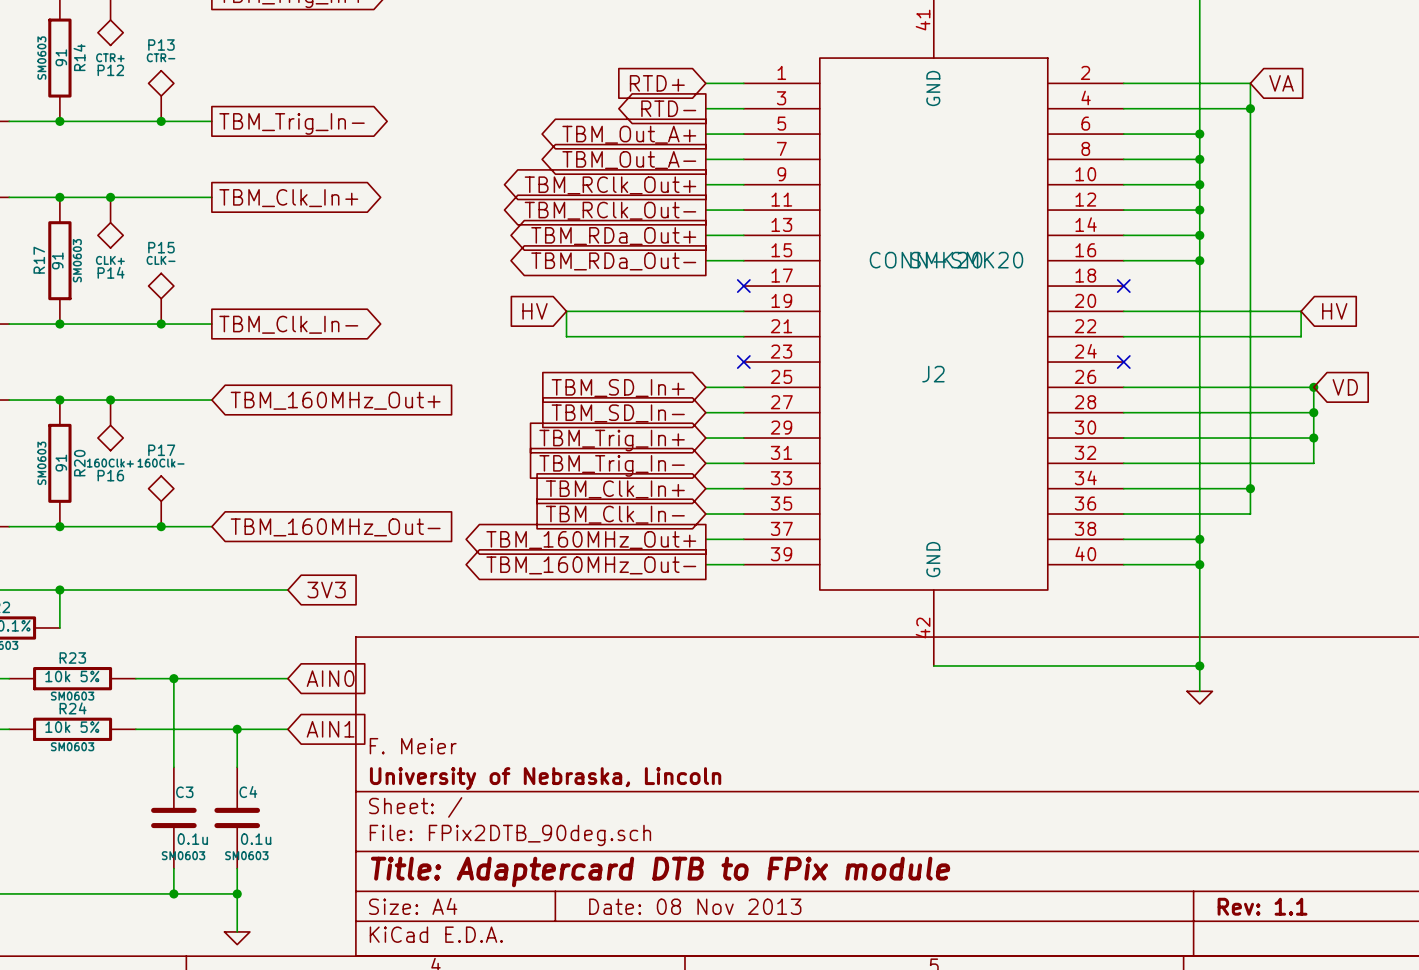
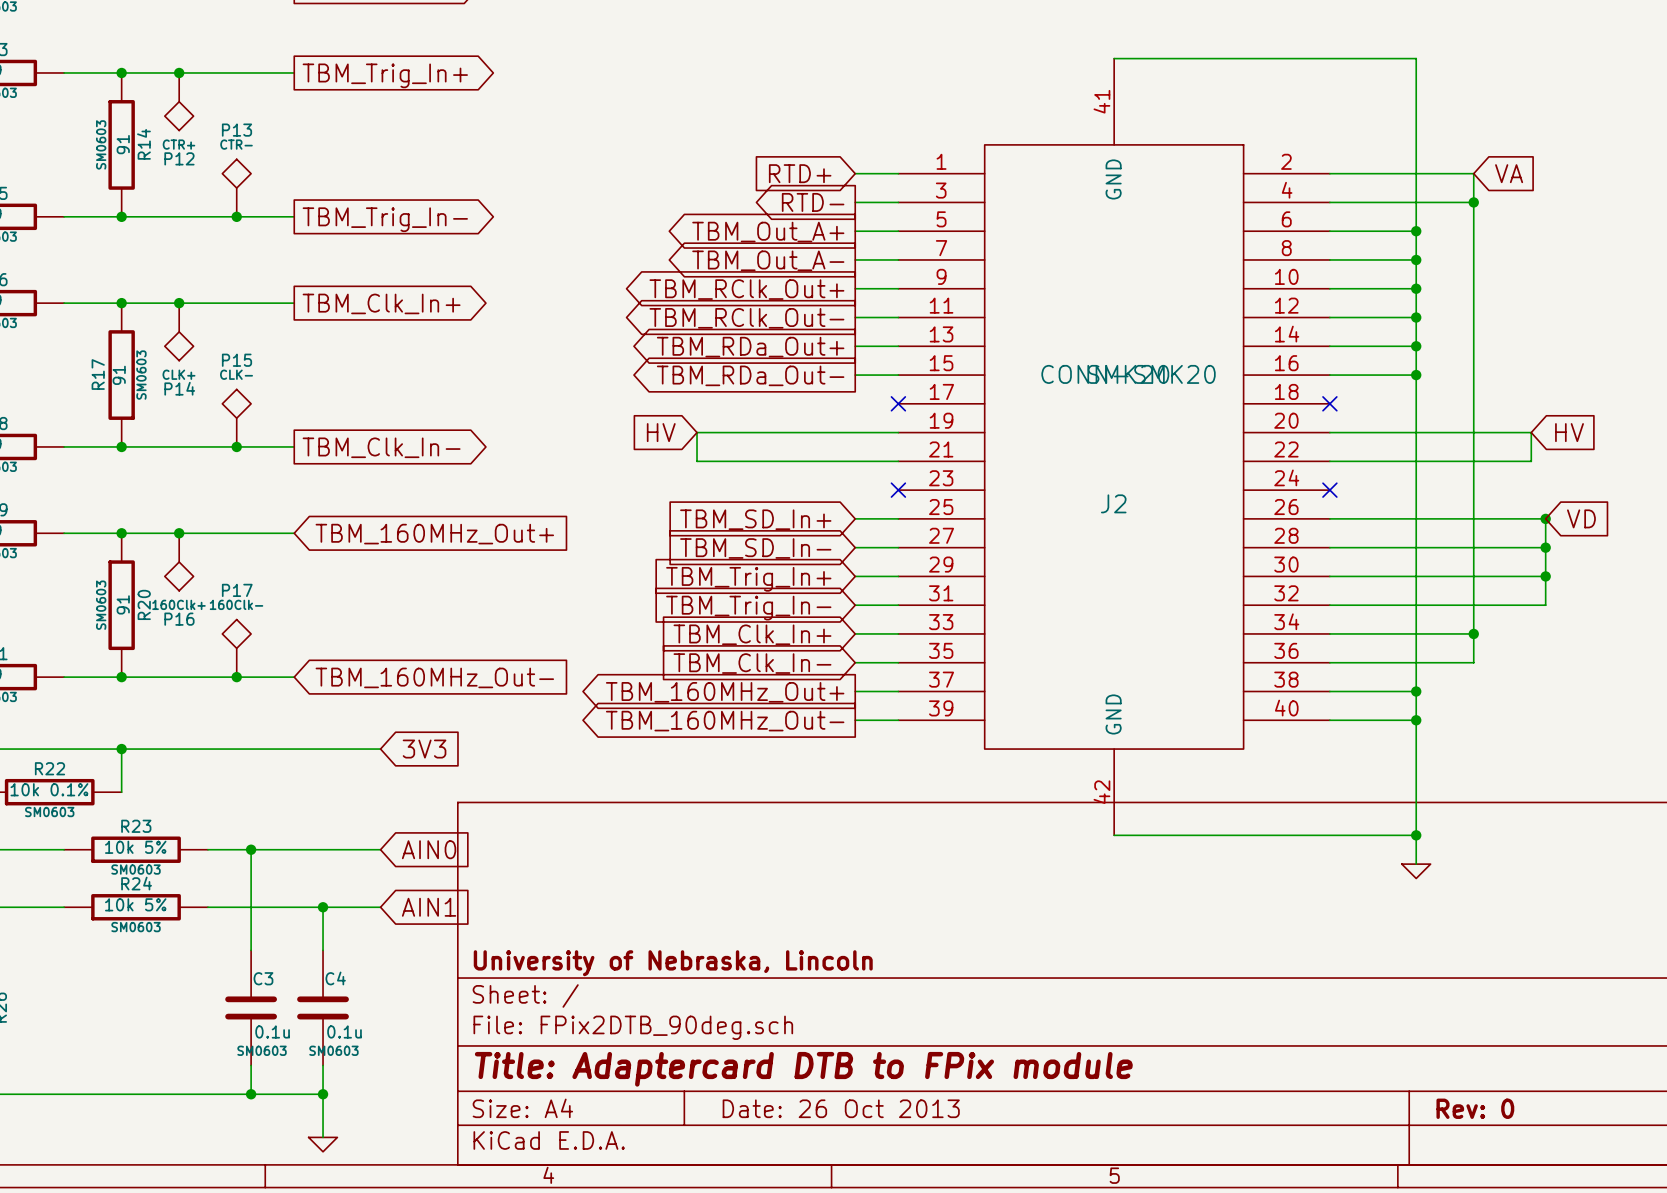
title block: F. Meier (413, 746) -> none
title block: Date: 08 Nov 2013 (695, 906) -> Date: 26 Oct 2013 (841, 1108)
title block: Rev: 1.1 (1262, 906) -> Rev: 0 (1475, 1108)

